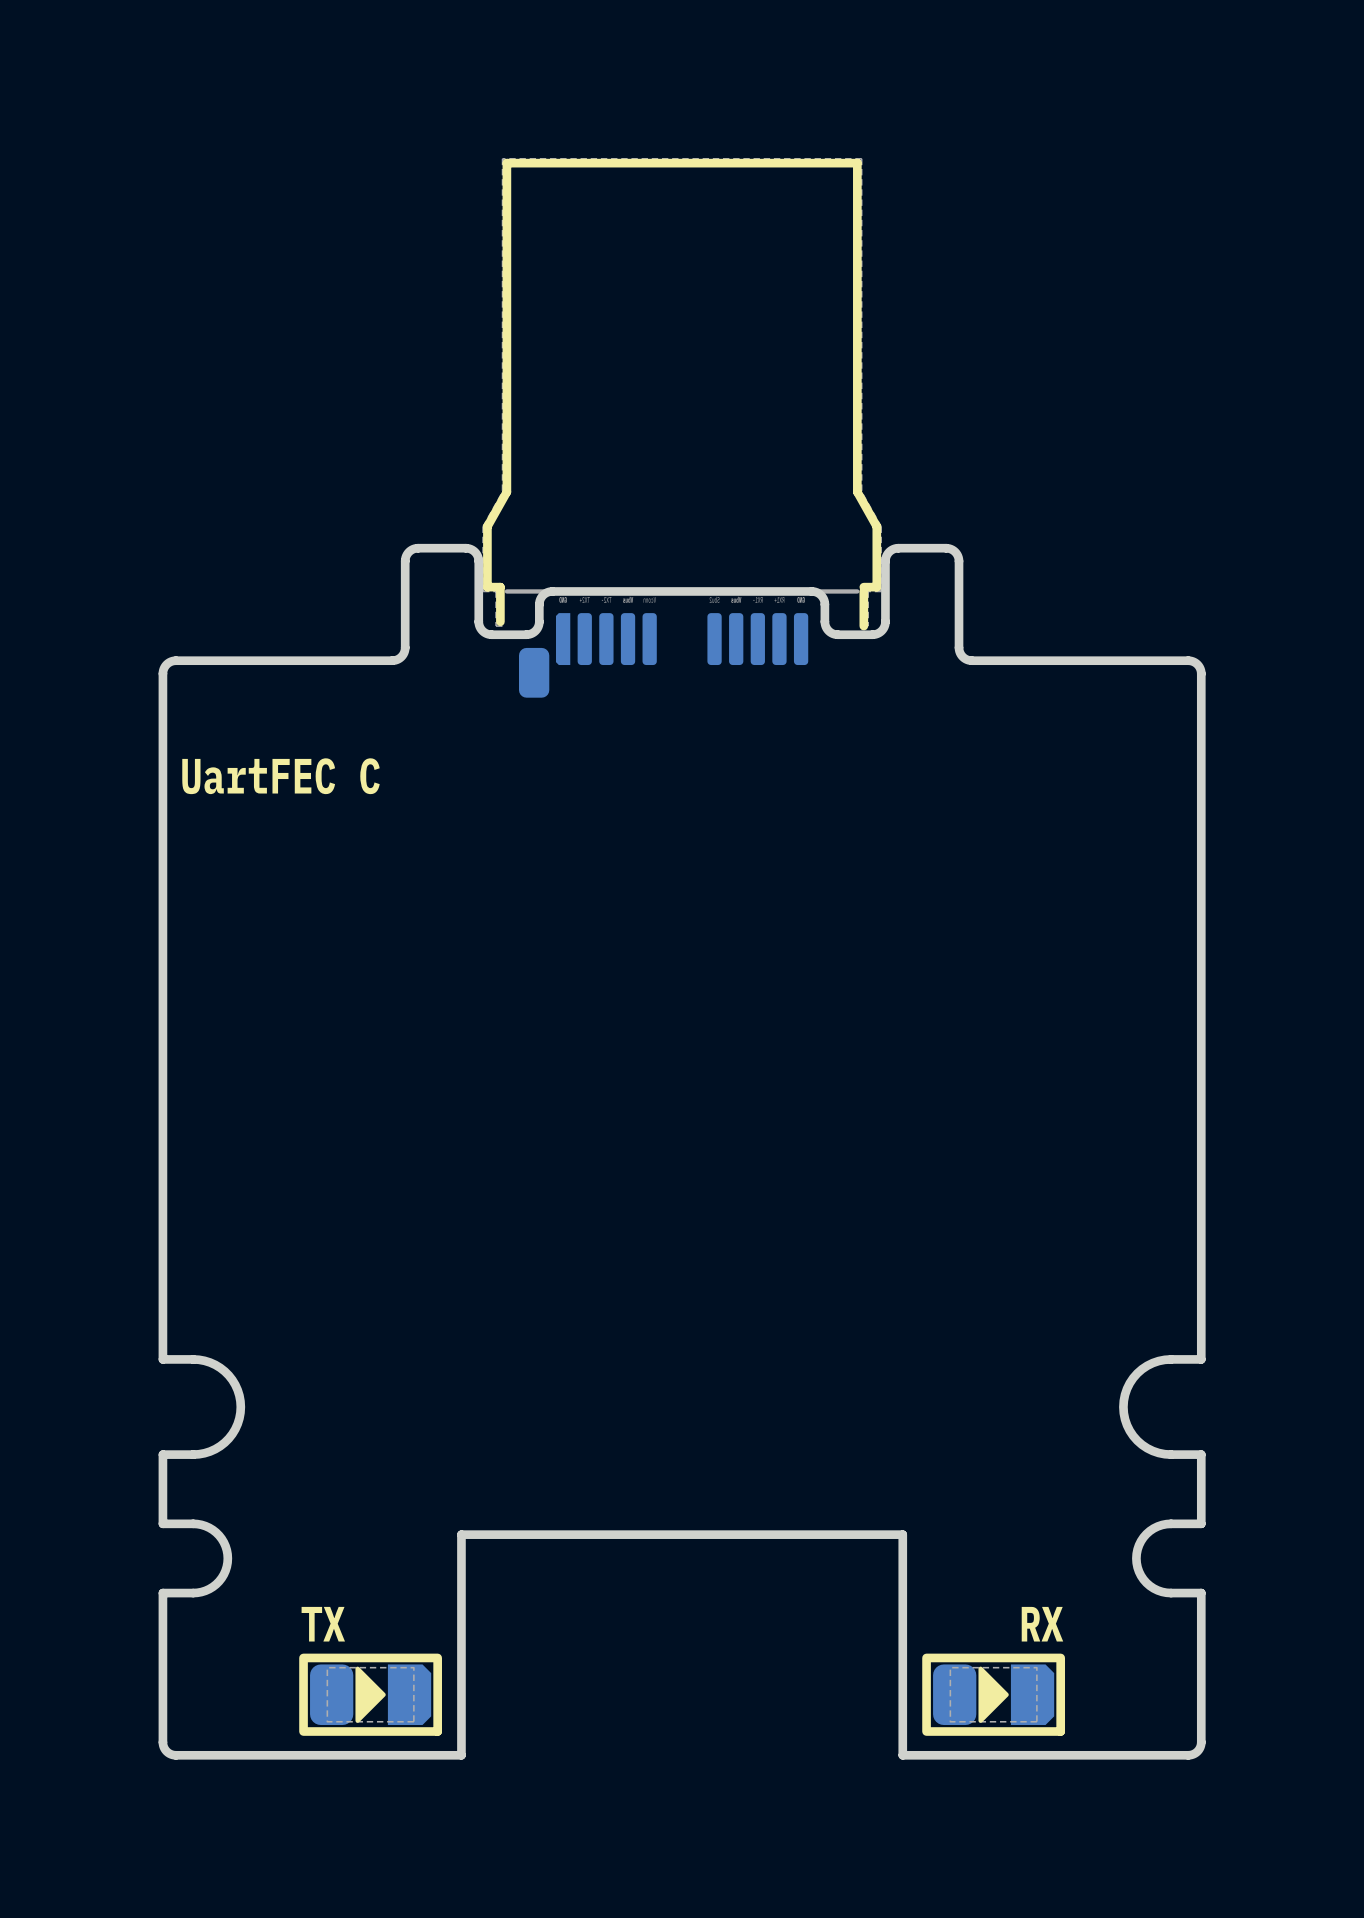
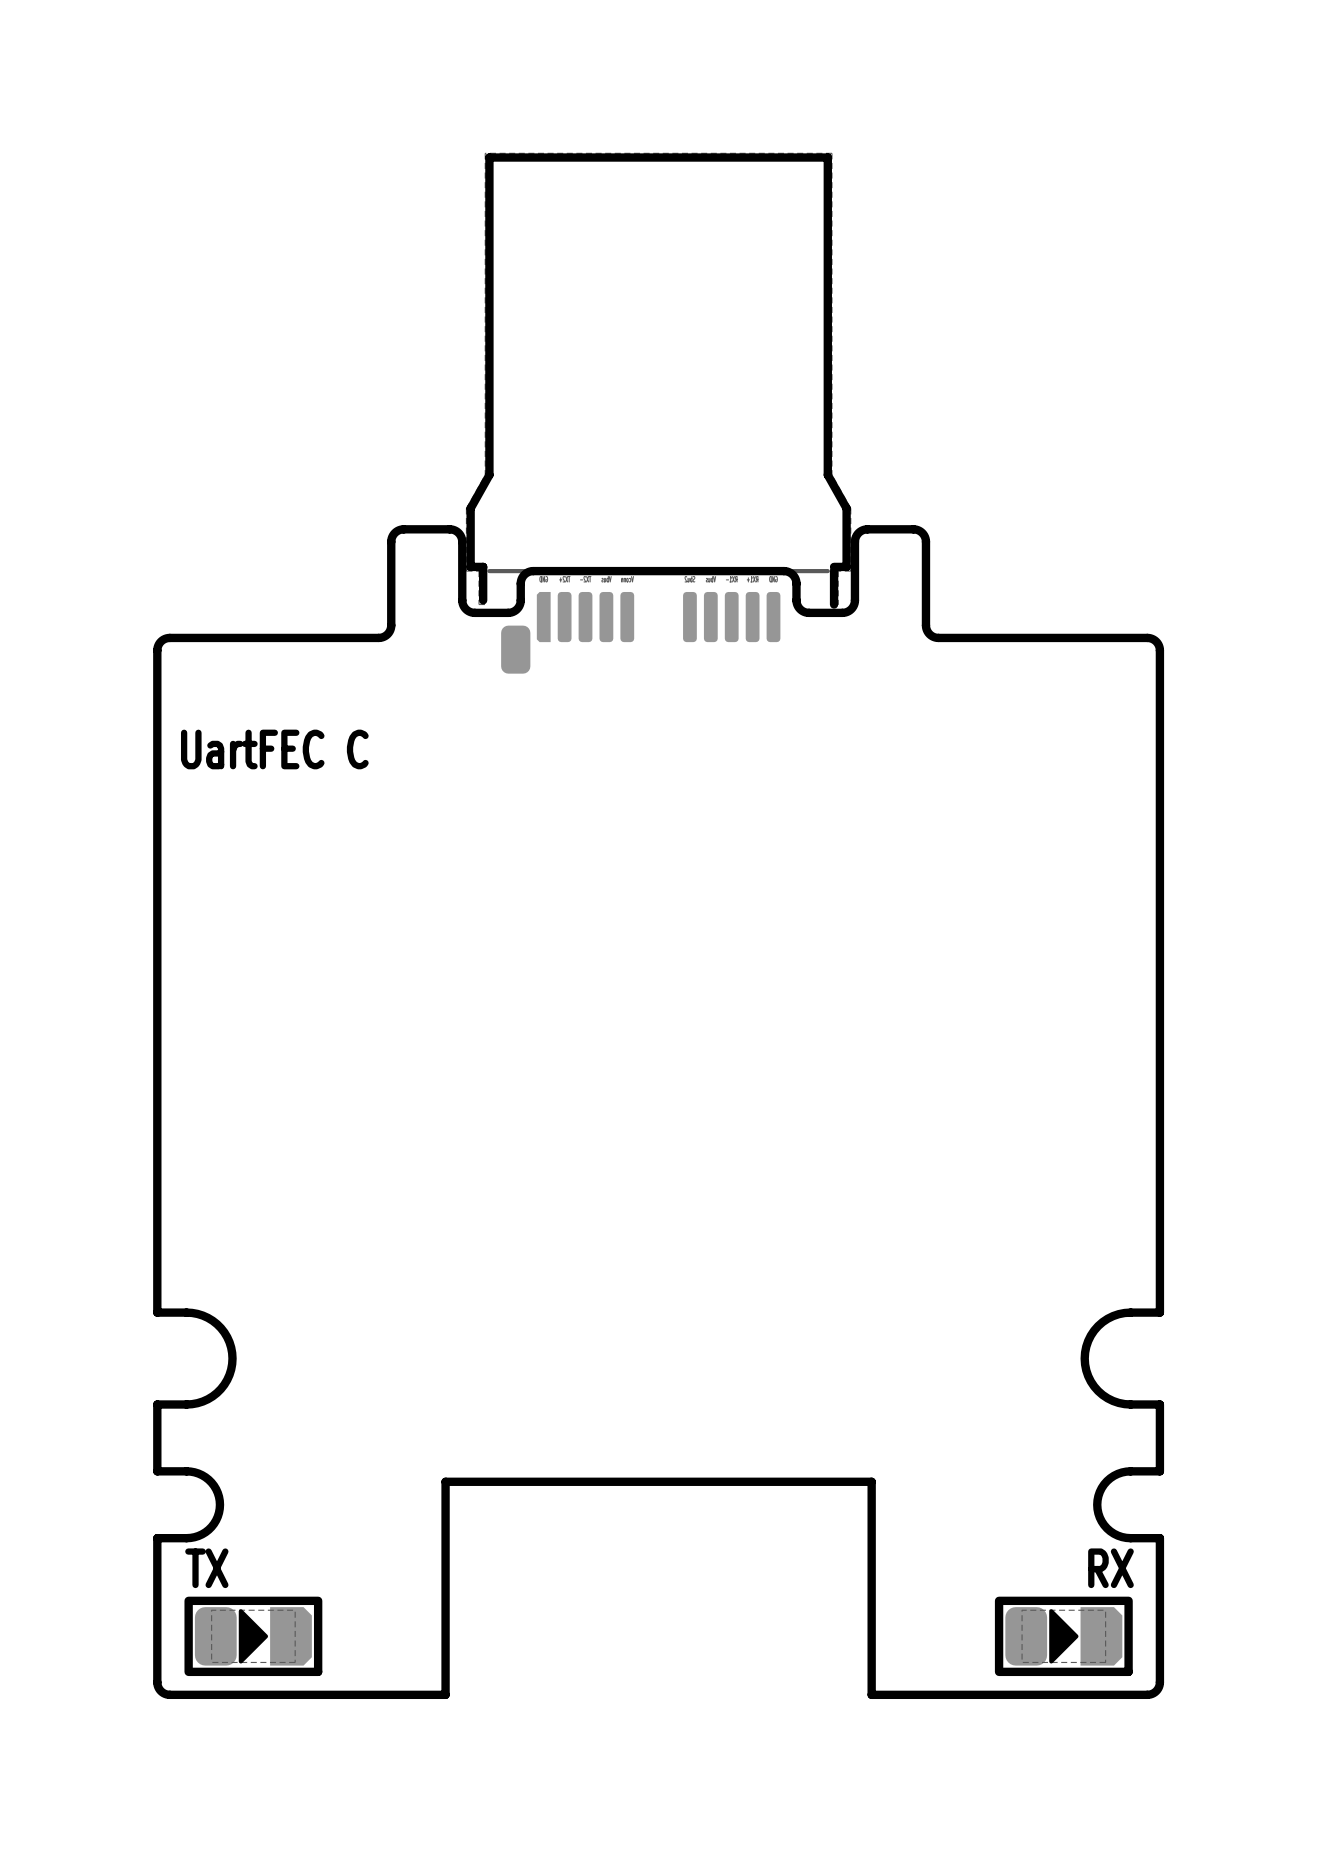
part position: (370, 1694) -> (253, 1636)
part position: (993, 1694) -> (1063, 1636)

